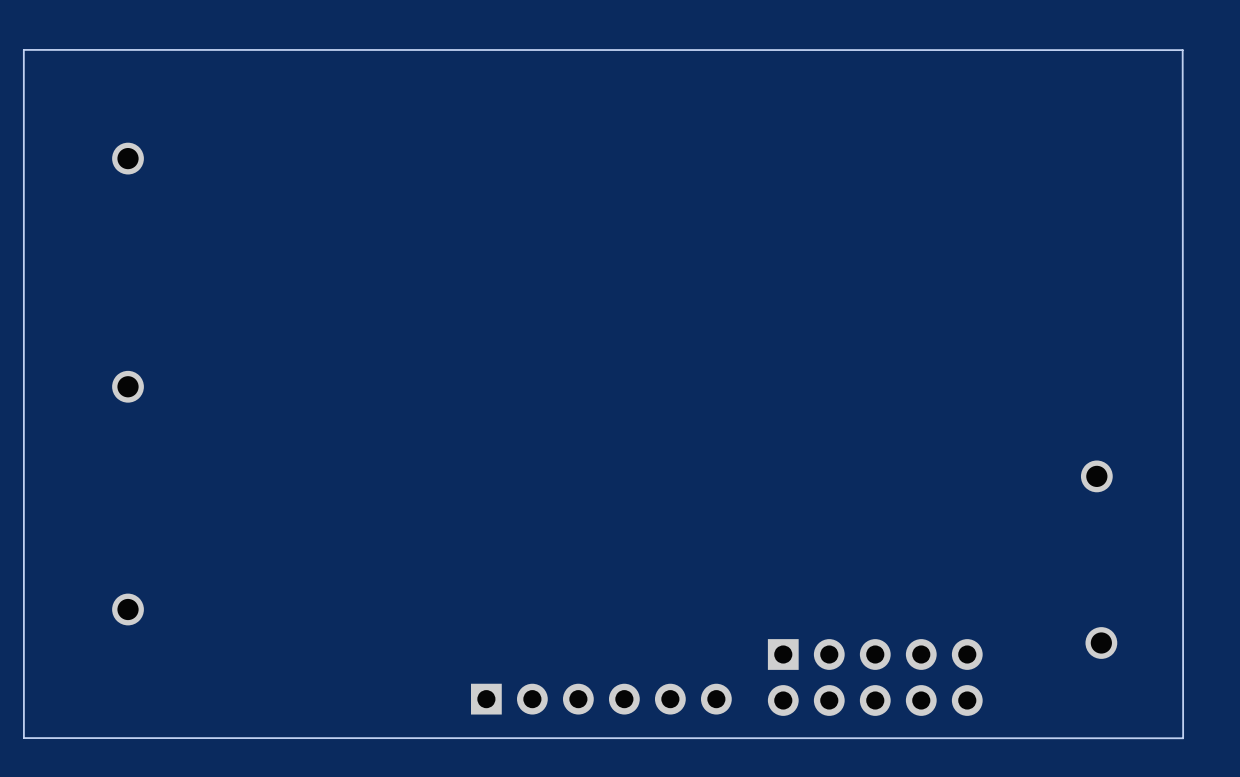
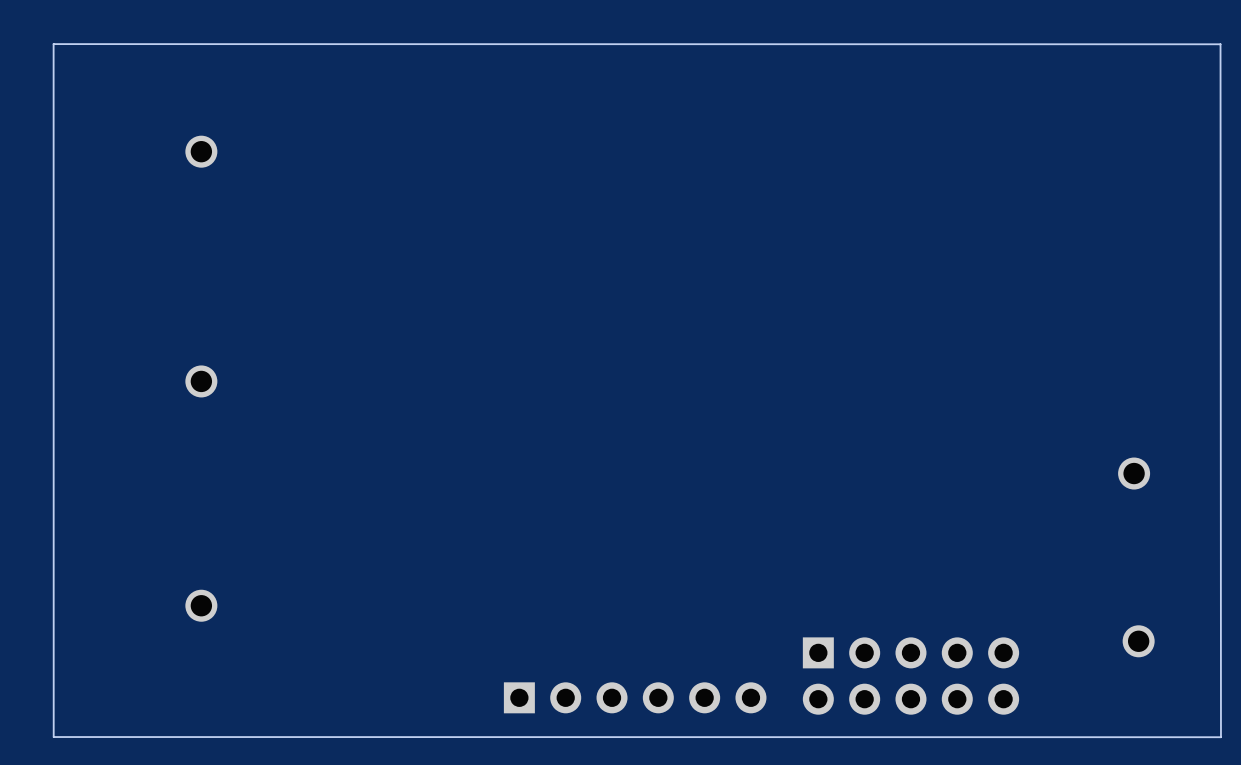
part position: (128, 158) -> (201, 151)
part position: (128, 386) -> (201, 381)
part position: (128, 609) -> (201, 605)

